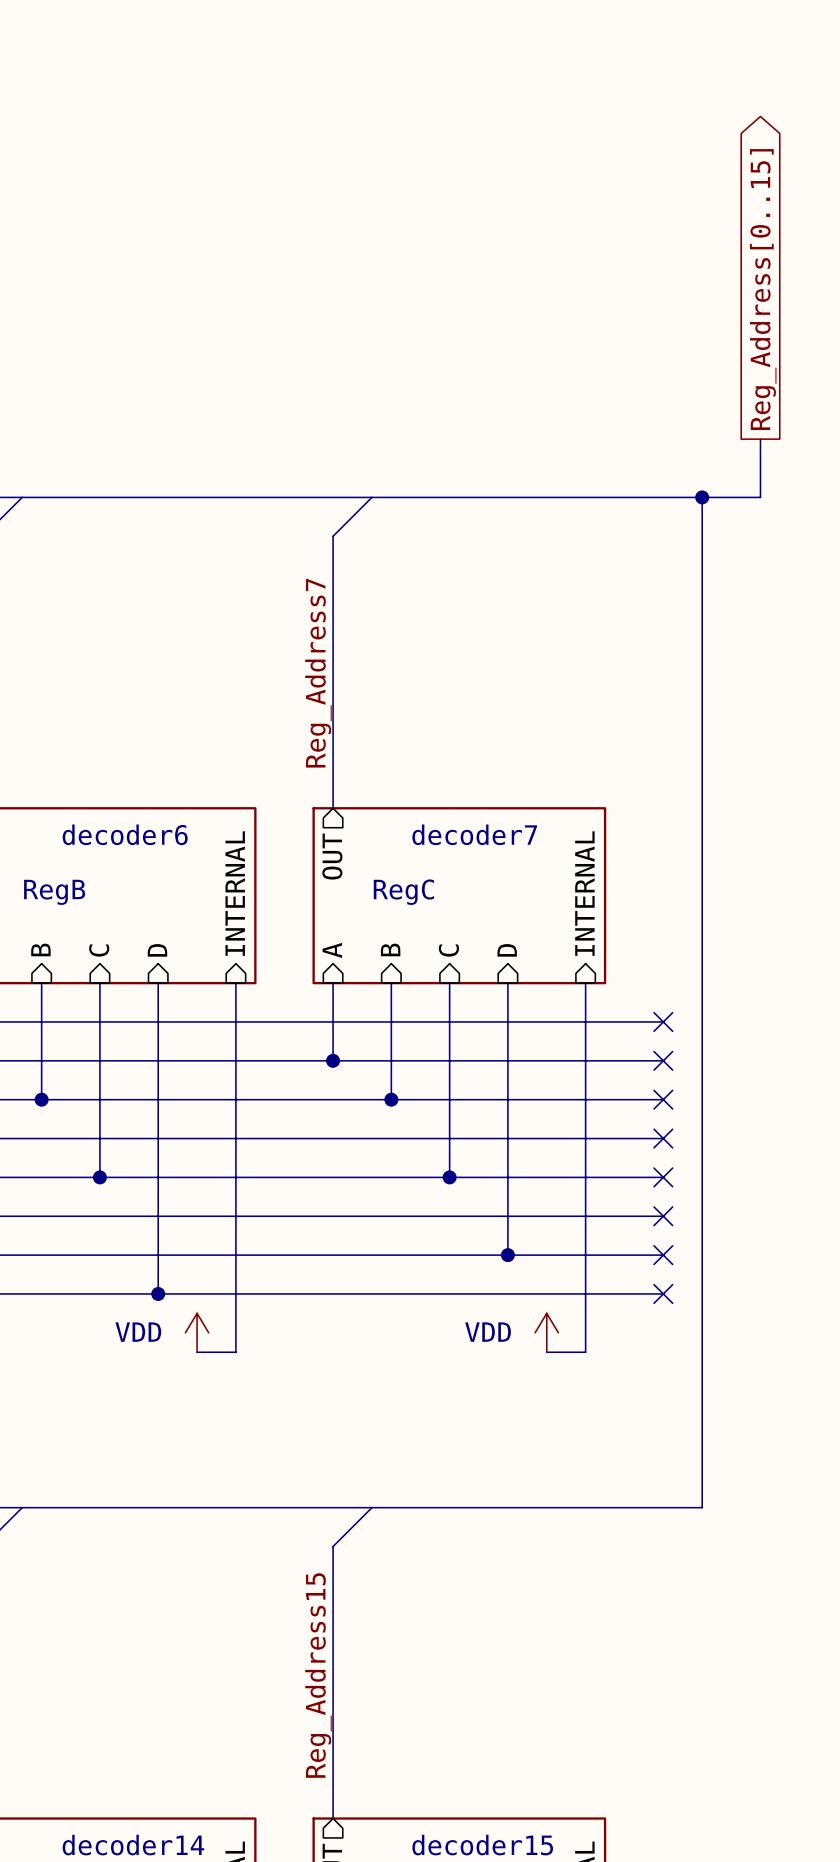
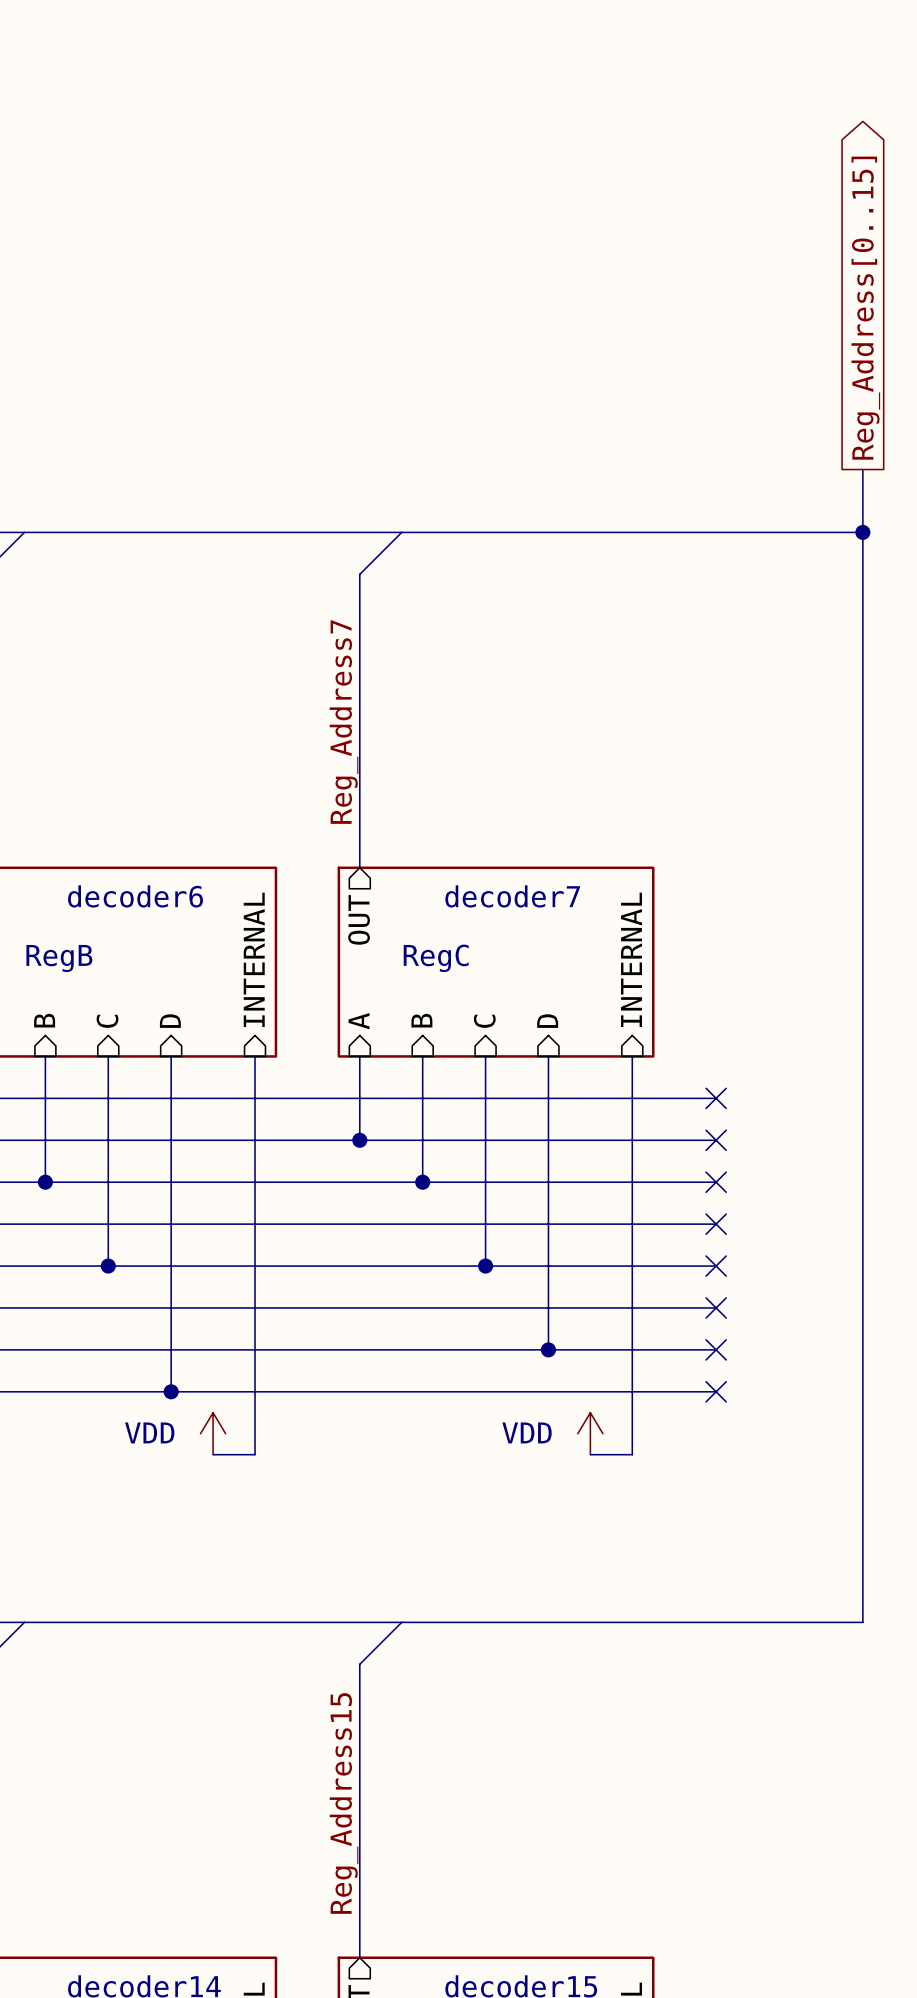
global label position: Reg_Address[0..15] (763, 289) -> Reg_Address[0..15] (865, 308)
bus: (760, 439) (760, 497) -> (862, 532) (820, 532)
bus: (702, 497) (702, 1507) -> (862, 469) (862, 1622) (758, 1622)
junction: (702, 497) -> none
junction: none -> (862, 532)

